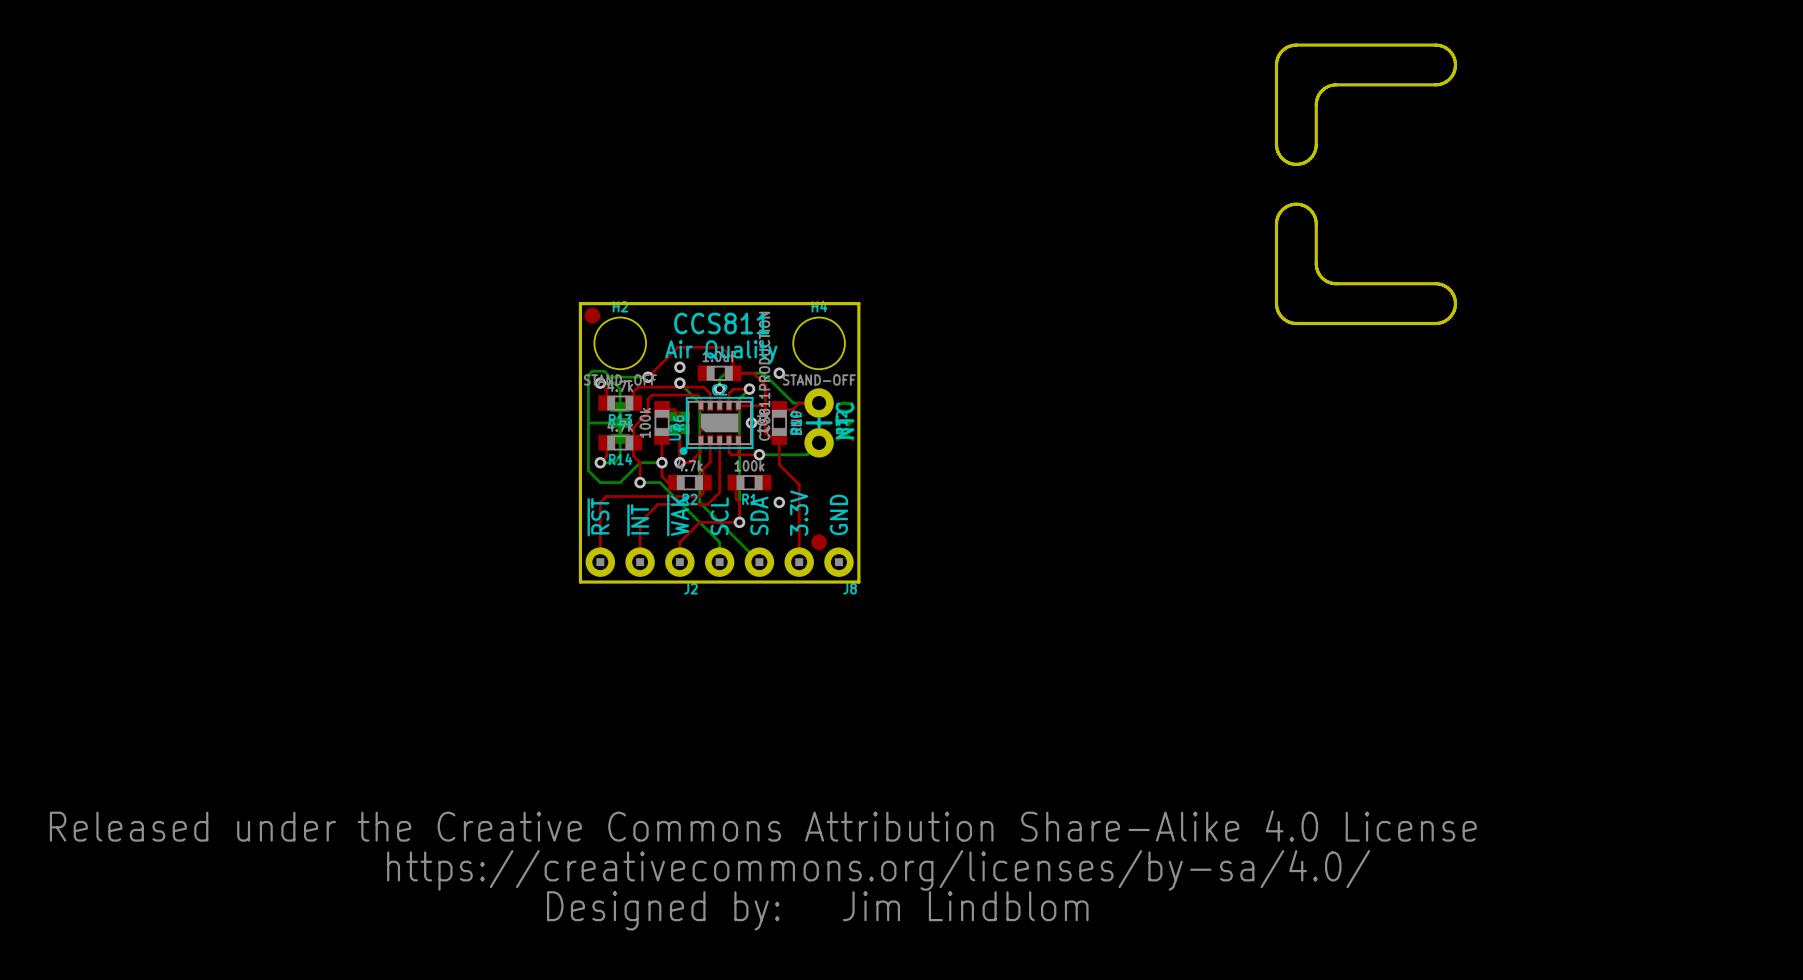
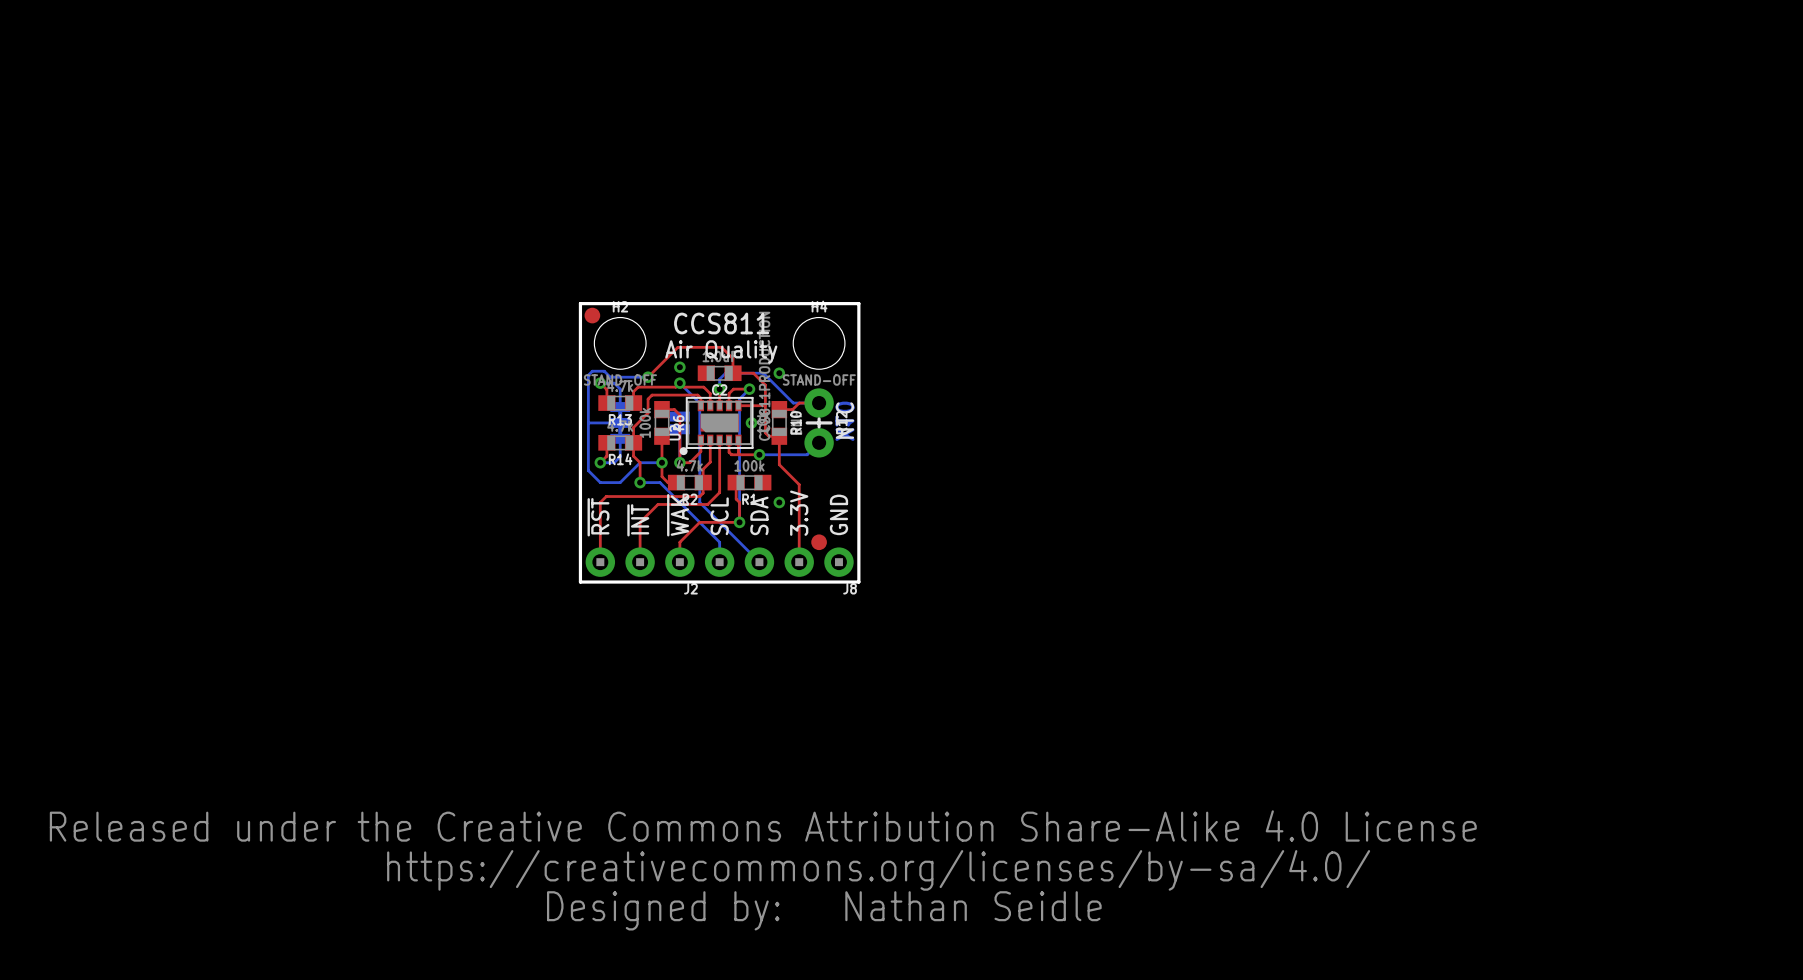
board edge: (1296, 45) (1438, 45) (1445, 47) (1451, 52) (1454, 59) (1455, 67) (1449, 79) (1438, 84) (1336, 84) (1326, 87) (1318, 94) (1316, 102) (1314, 152) (1306, 161) (1293, 164) (1282, 158) (1276, 147) (1276, 64) (1278, 57) (1282, 50) (1288, 46) (1296, 45) -> none
board edge: (1296, 204) (1306, 206) (1314, 216) (1316, 266) (1318, 273) (1324, 279) (1336, 283) (1440, 284) (1447, 287) (1453, 296) (1455, 306) (1451, 315) (1445, 320) (1435, 323) (1296, 323) (1284, 319) (1279, 313) (1276, 306) (1276, 221) (1279, 214) (1284, 208) (1296, 204) -> none
text: Jim Lindblom (965, 906) -> Nathan Seidle (973, 906)

